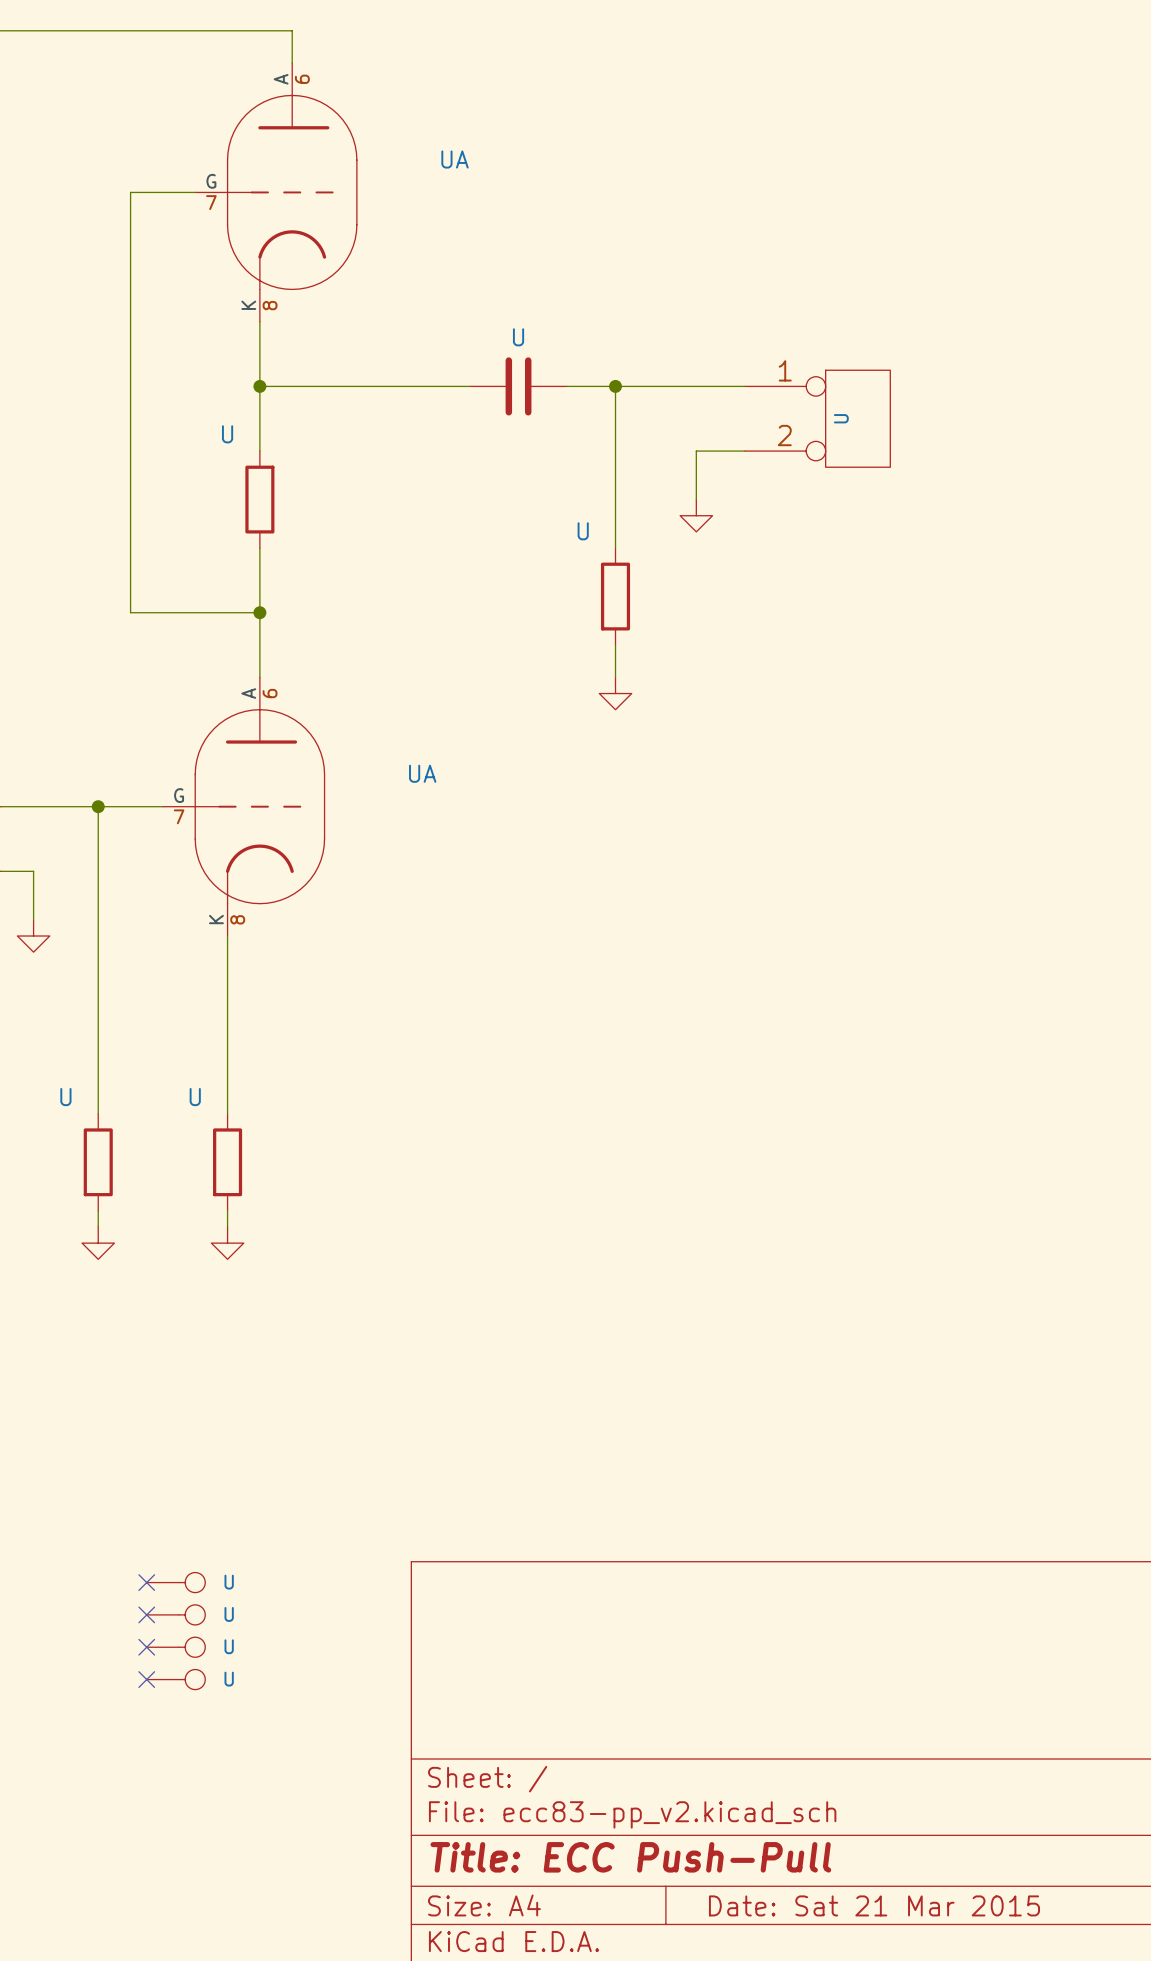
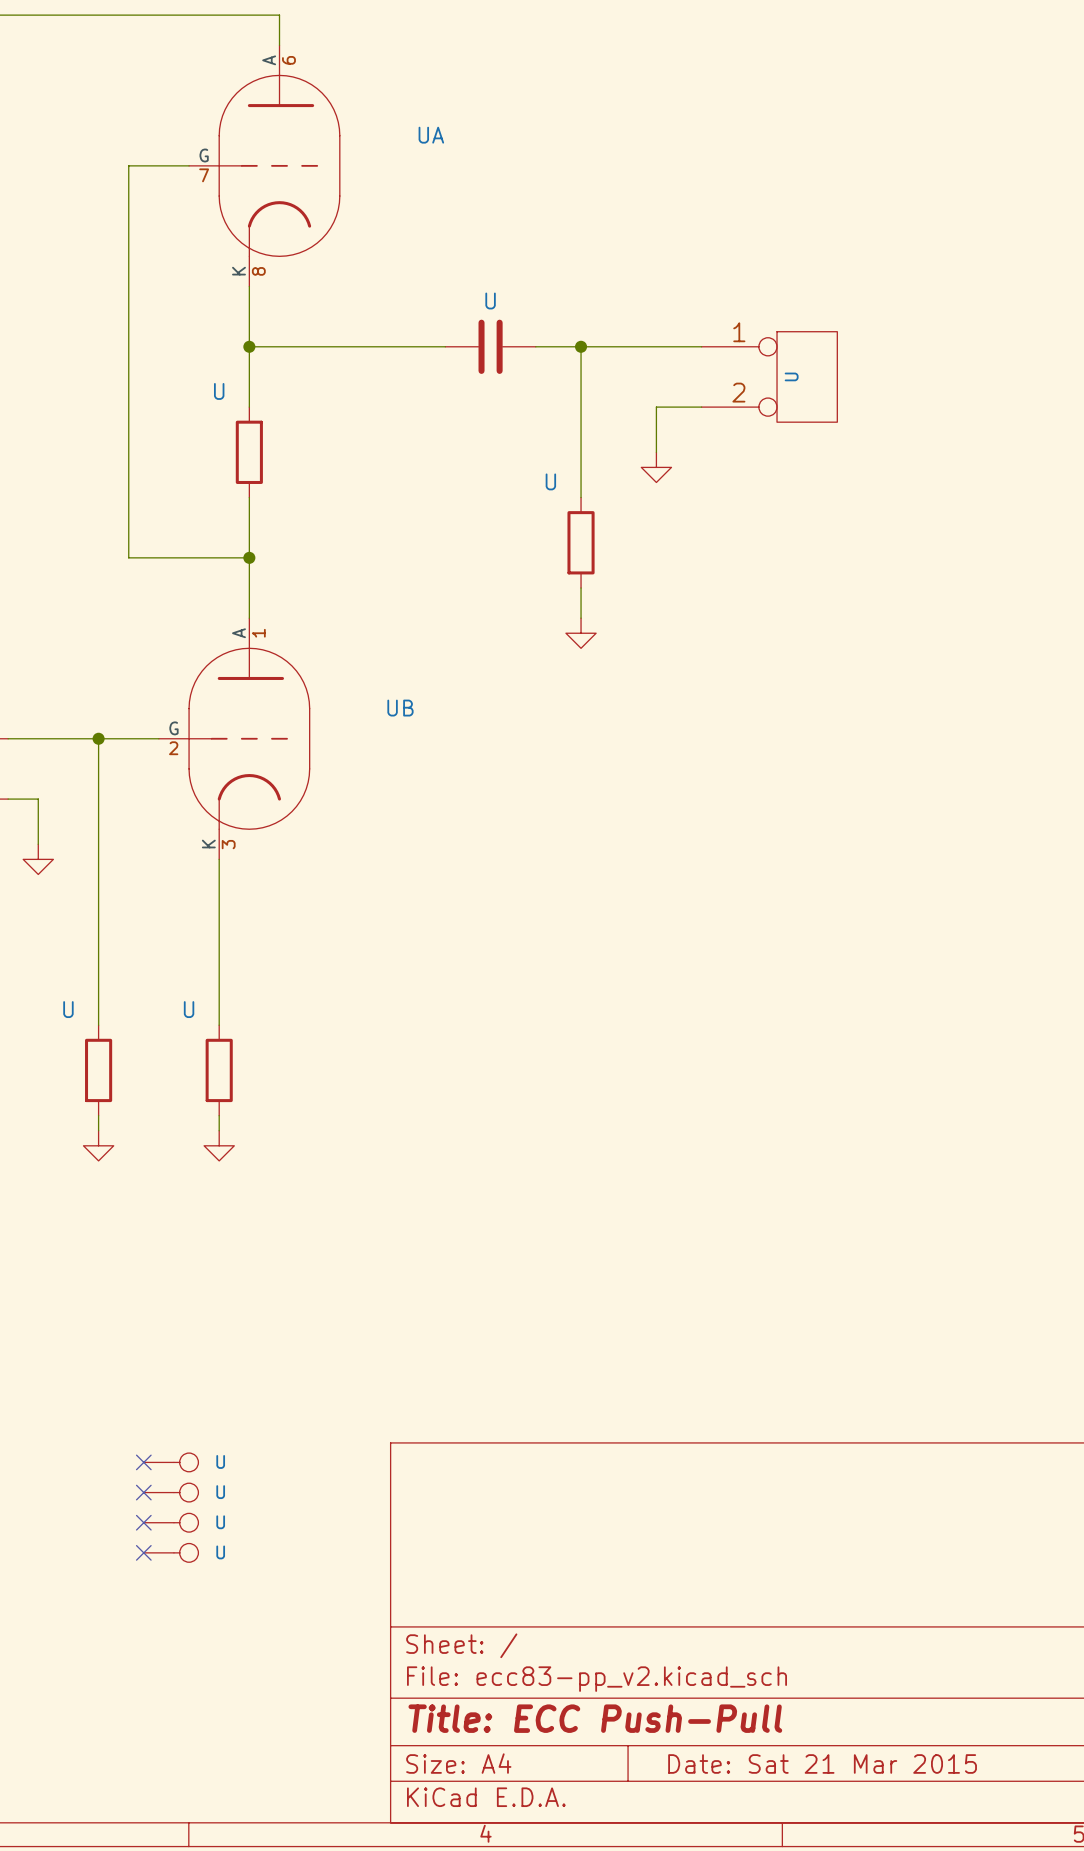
UA pin number: 6 (270, 693) -> 1 (258, 633)
UA name: UA (422, 773) -> UB (400, 708)
UA pin number: 7 (179, 816) -> 2 (173, 748)
UA pin number: 8 (237, 919) -> 3 (228, 844)

